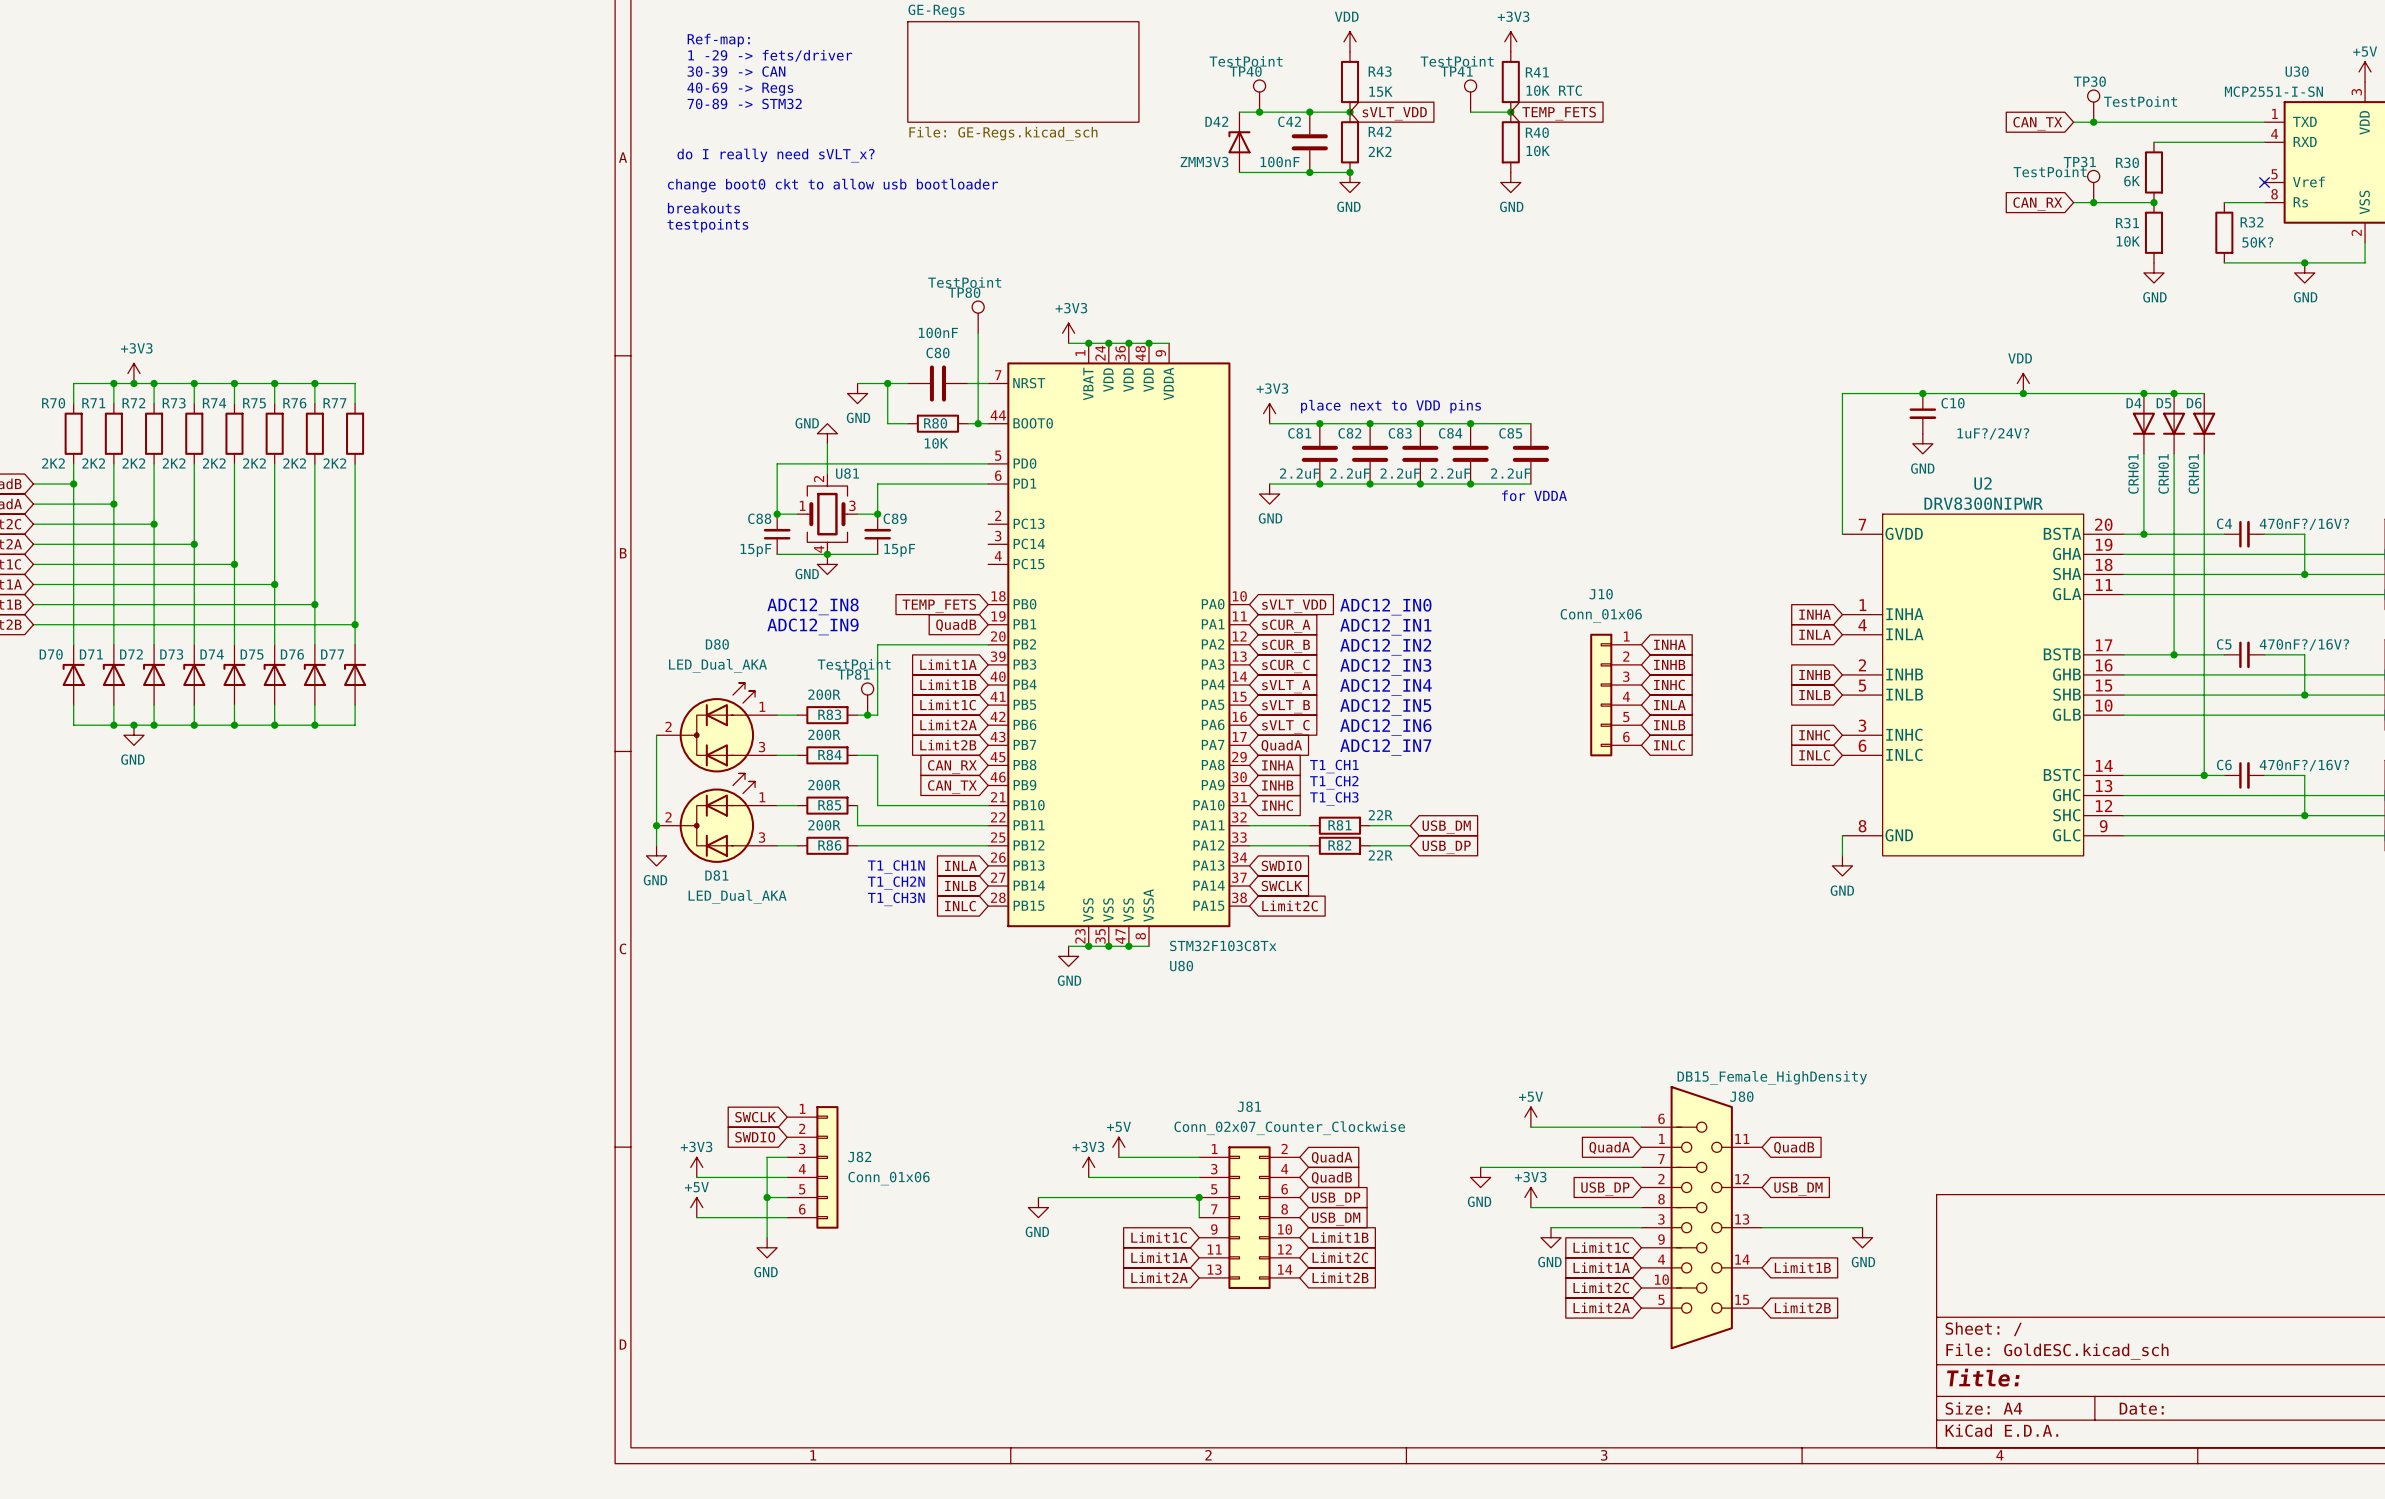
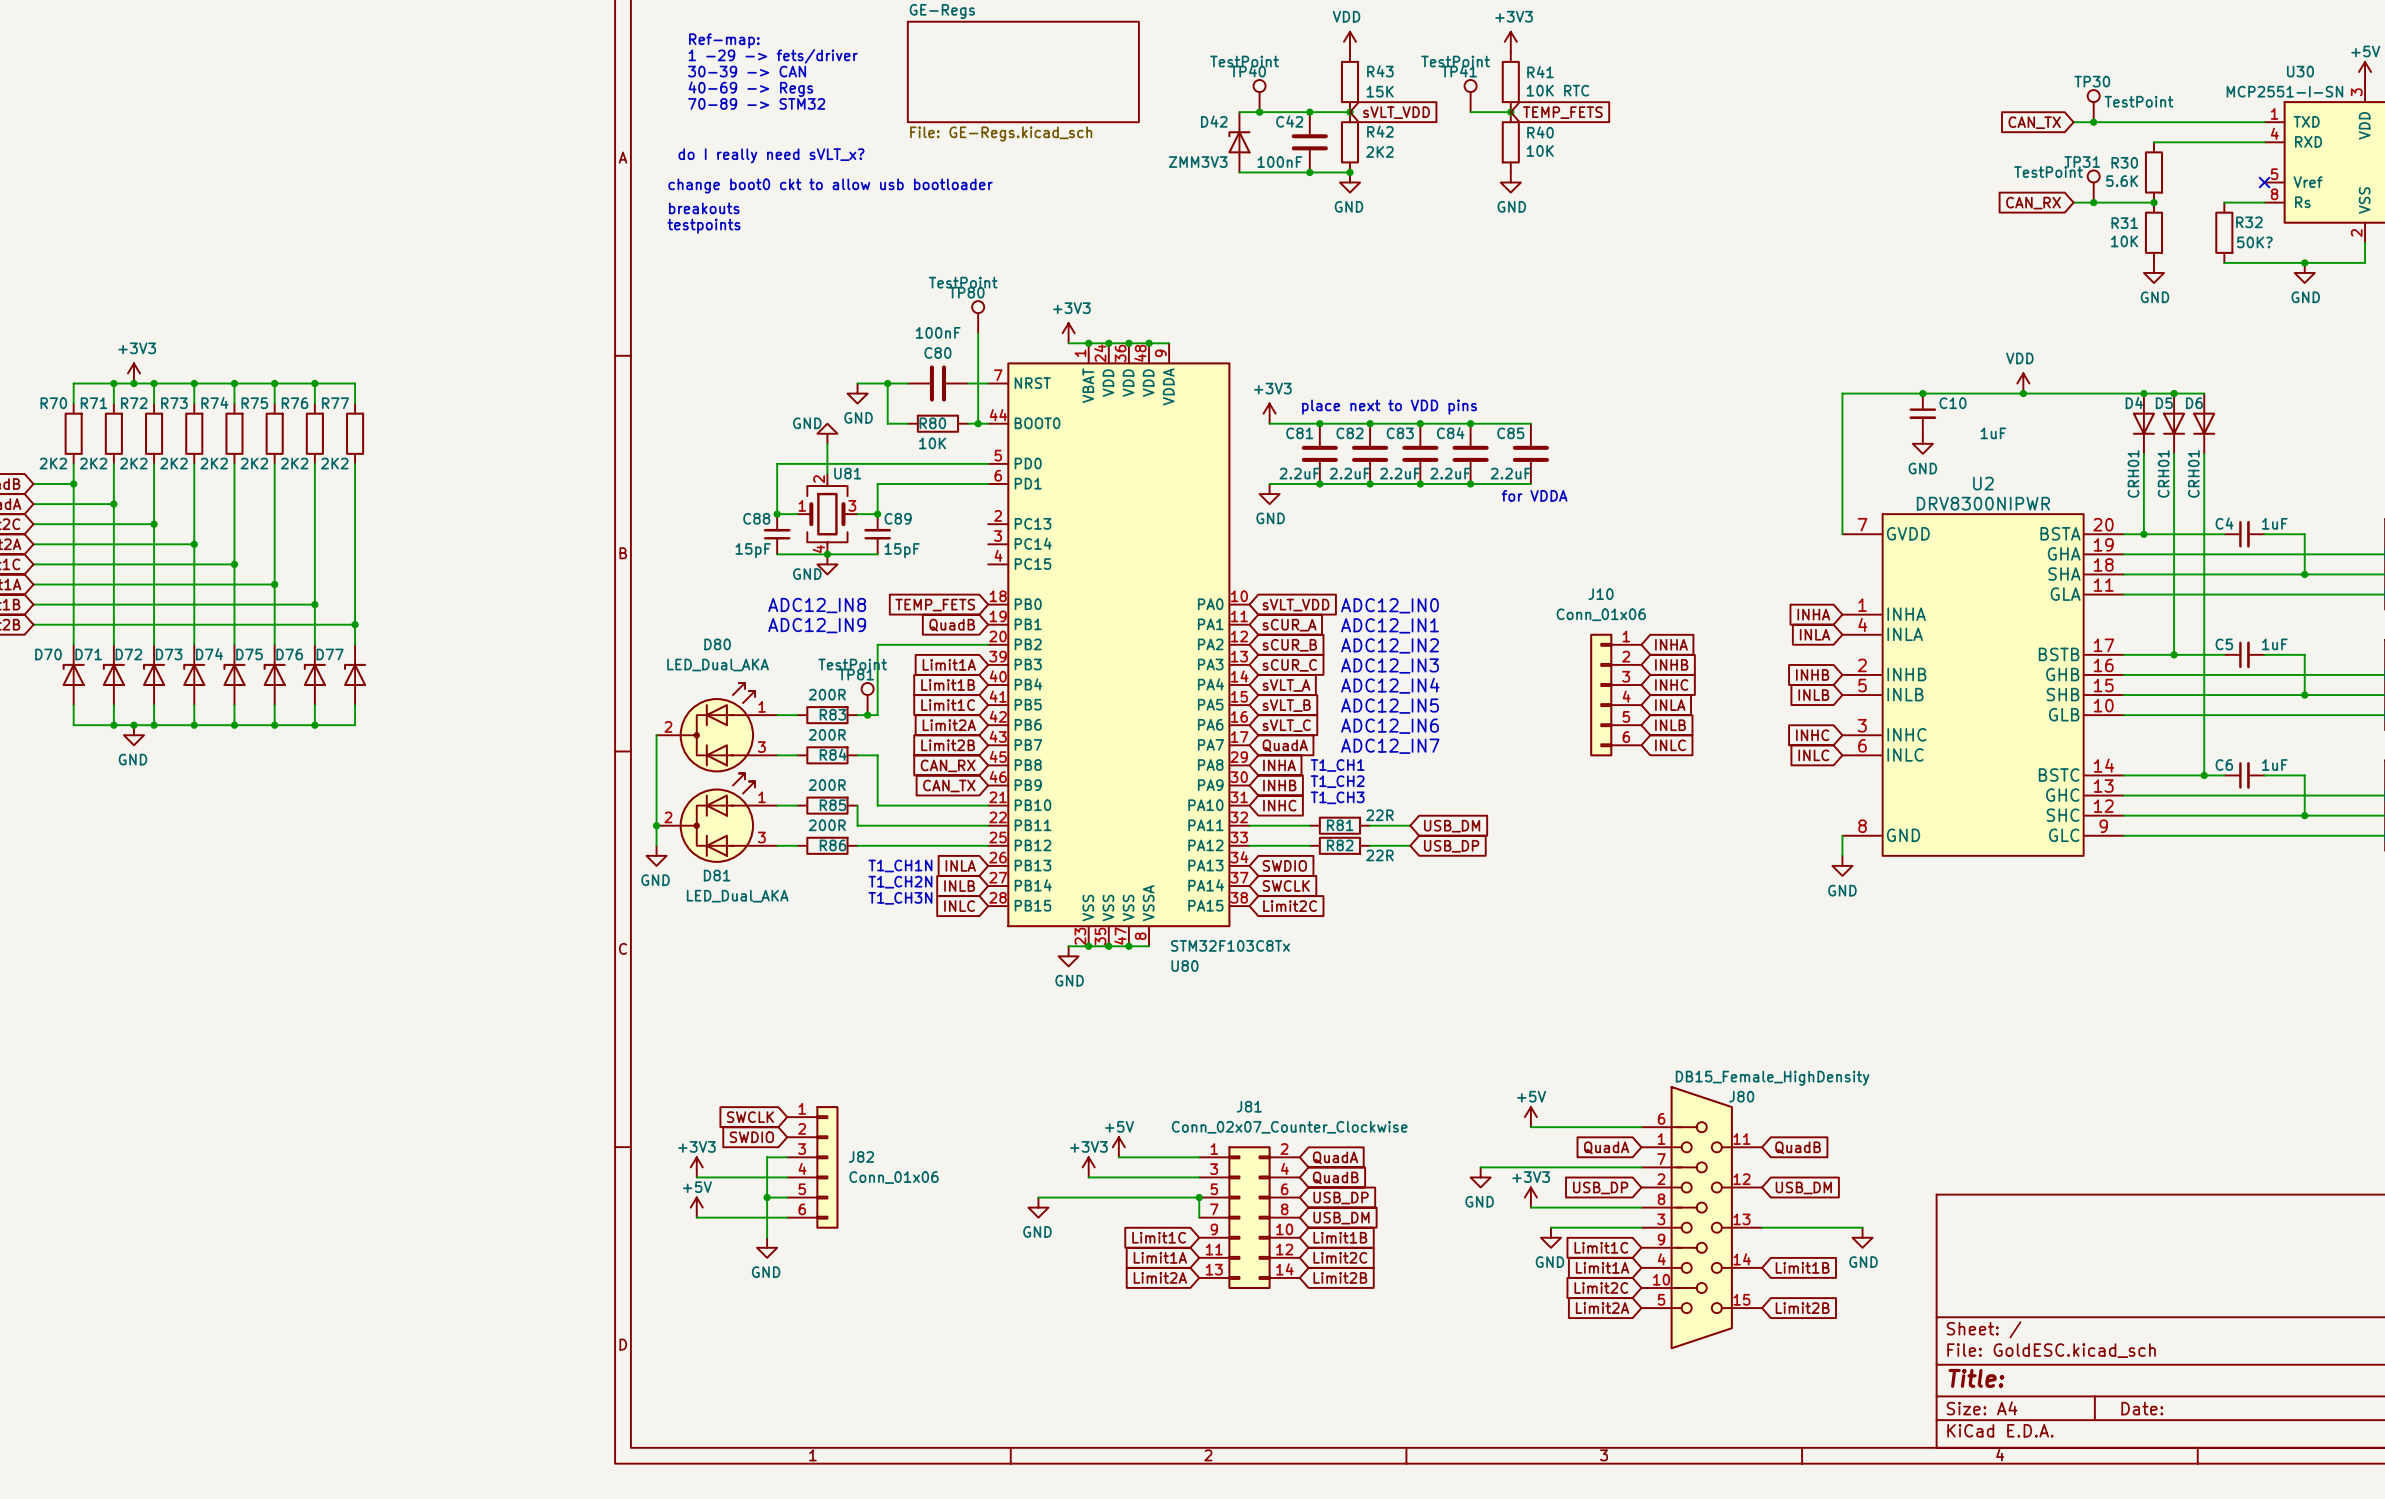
R30 value: 6K (2132, 181) -> 5.6K (2122, 181)
C10 value: 1uF?/24V? (1993, 433) -> 1uF (1993, 433)
C4 value: 470nF?/16V? (2304, 524) -> 1uF (2274, 523)
C5 value: 470nF?/16V? (2304, 644) -> 1uF (2274, 644)
C6 value: 470nF?/16V? (2304, 765) -> 1uF (2274, 765)

